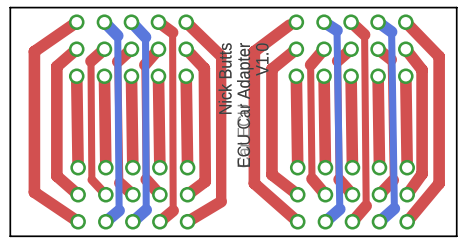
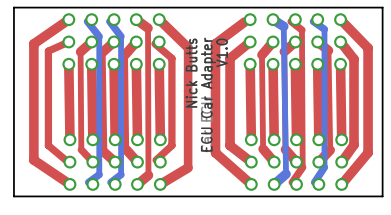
bottom track: (104, 22) (117, 35) (119, 210) (105, 221) -> none
bottom track: (131, 22) (145, 37) (146, 209) (132, 221) -> none
top track: (351, 22) (364, 34) (366, 205) (352, 221) -> none
bottom track: (378, 22) (391, 31) (394, 208) (379, 221) -> none
bottom track: none -> (87, 21) (99, 36) (99, 174) (88, 182)
bottom track: none -> (109, 21) (121, 36) (121, 174) (110, 182)
top track: none -> (291, 21) (301, 30) (302, 167) (292, 182)
bottom track: none -> (313, 21) (324, 29) (324, 167) (314, 182)
top track: (76, 49) (56, 66) (56, 176) (78, 194) -> none
top track: (186, 49) (204, 68) (205, 181) (187, 194) -> none
top track: none -> (64, 43) (48, 51) (48, 145) (65, 160)
top track: none -> (154, 43) (171, 58) (171, 145) (156, 160)

